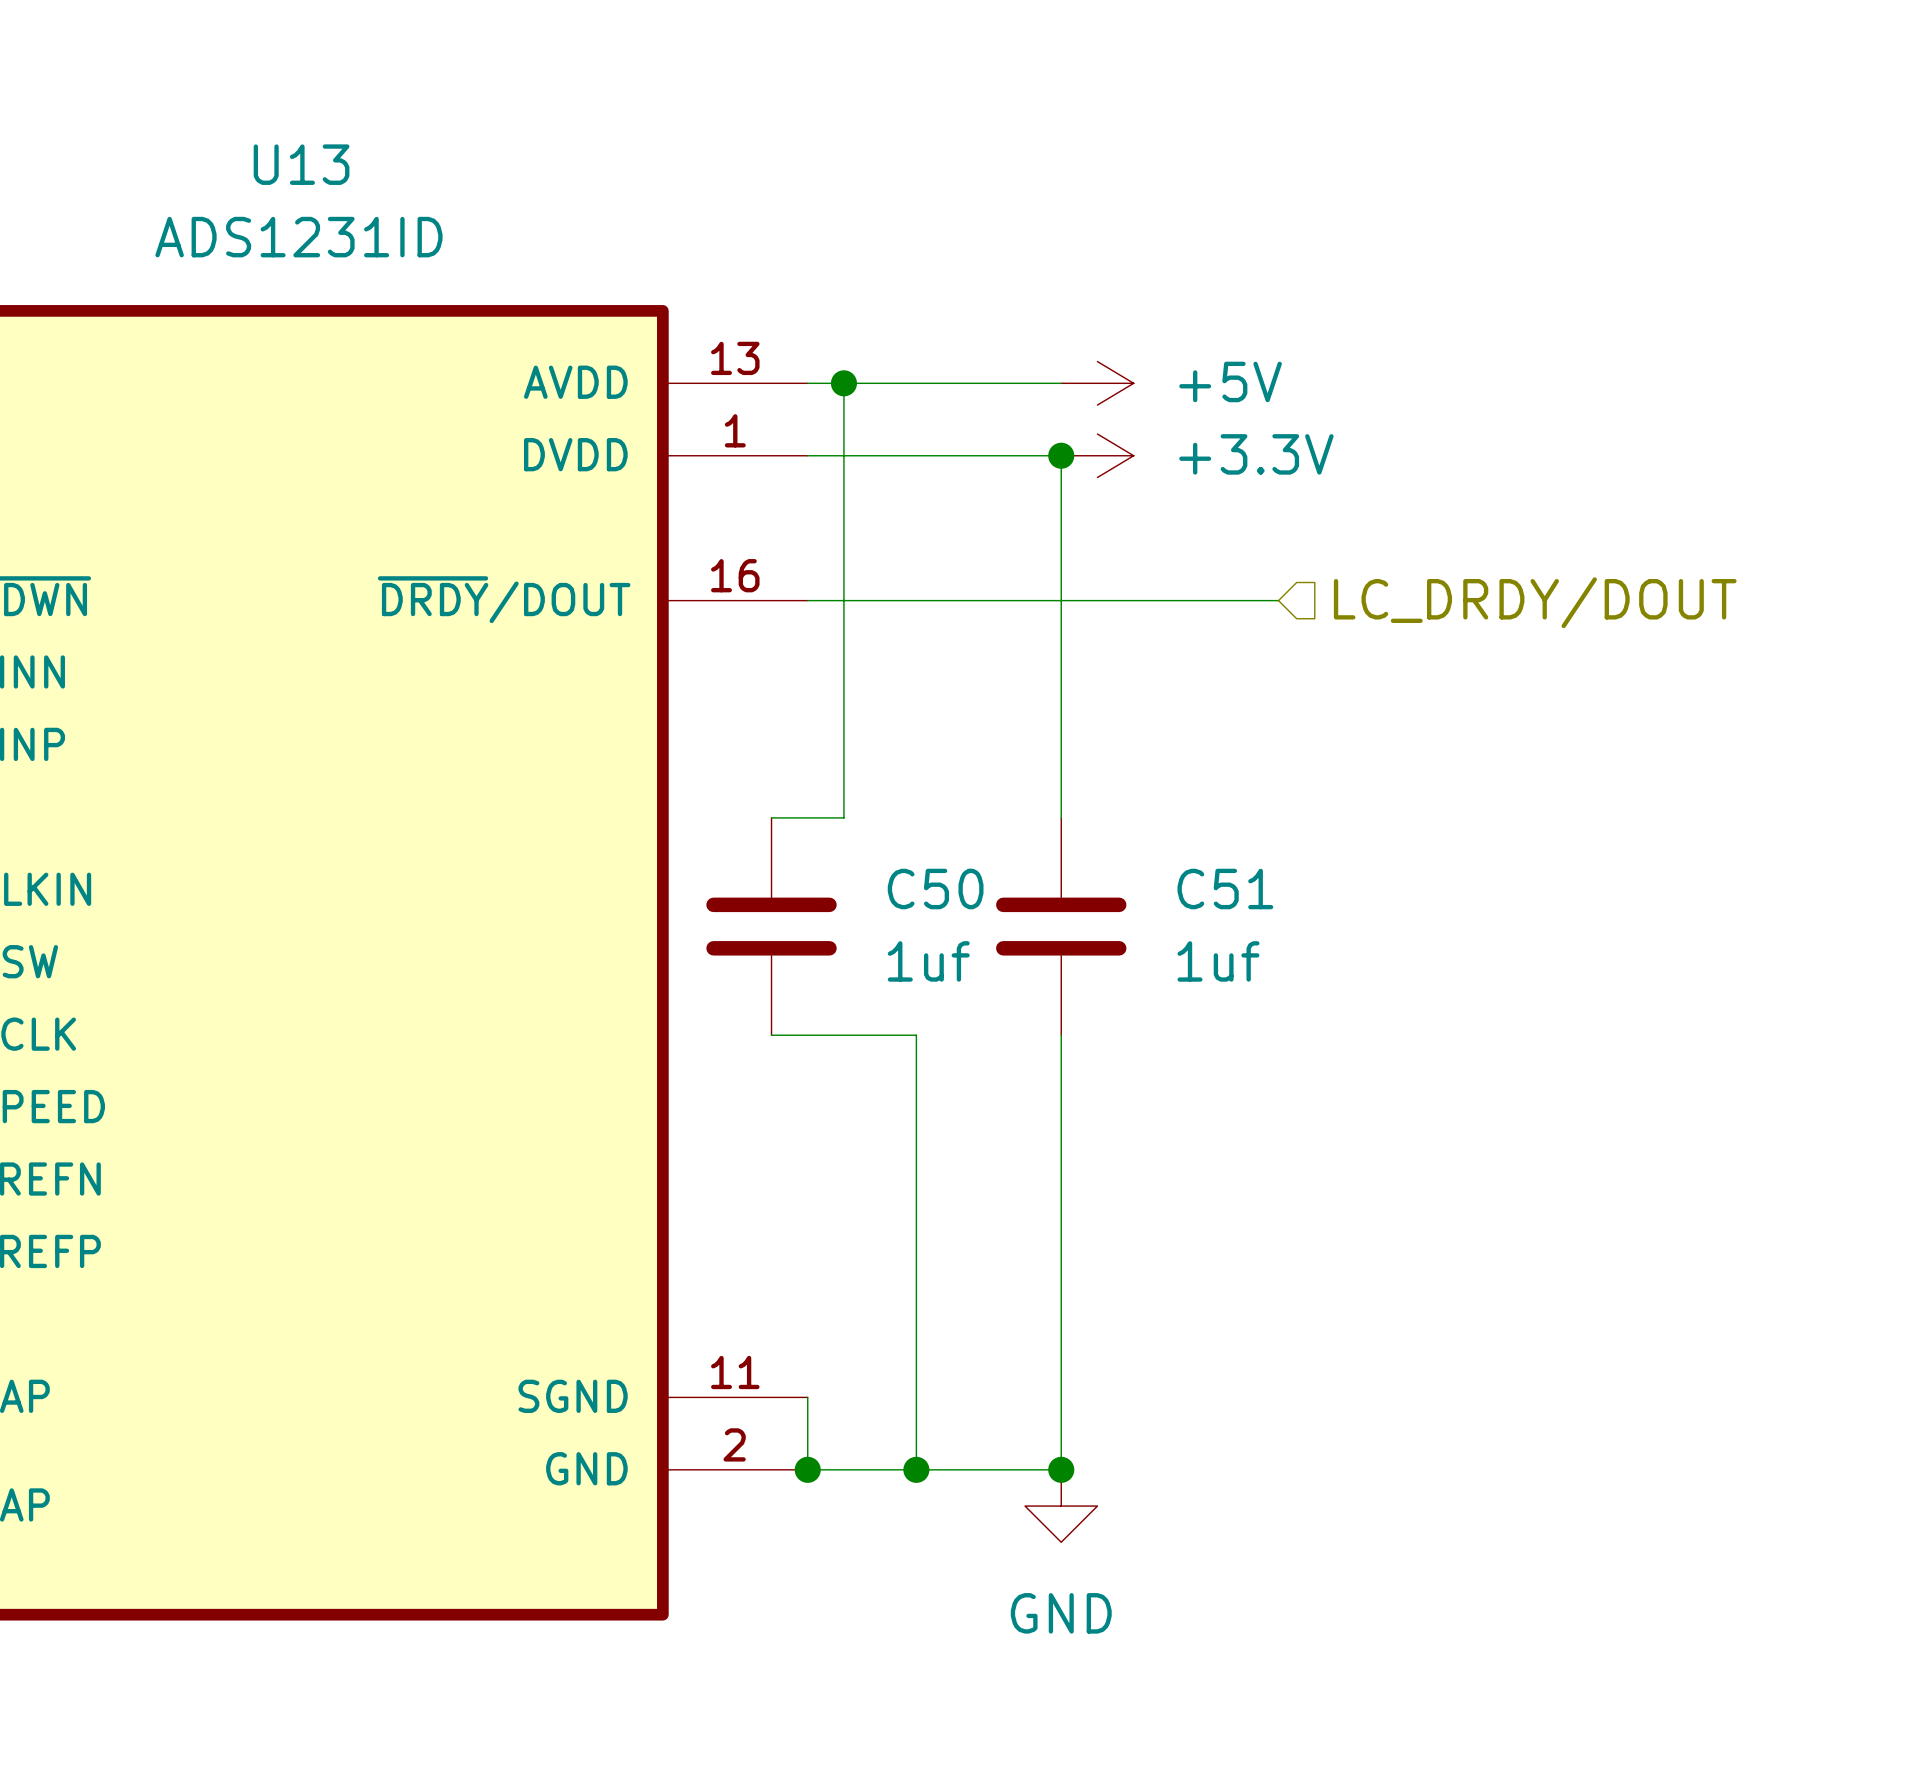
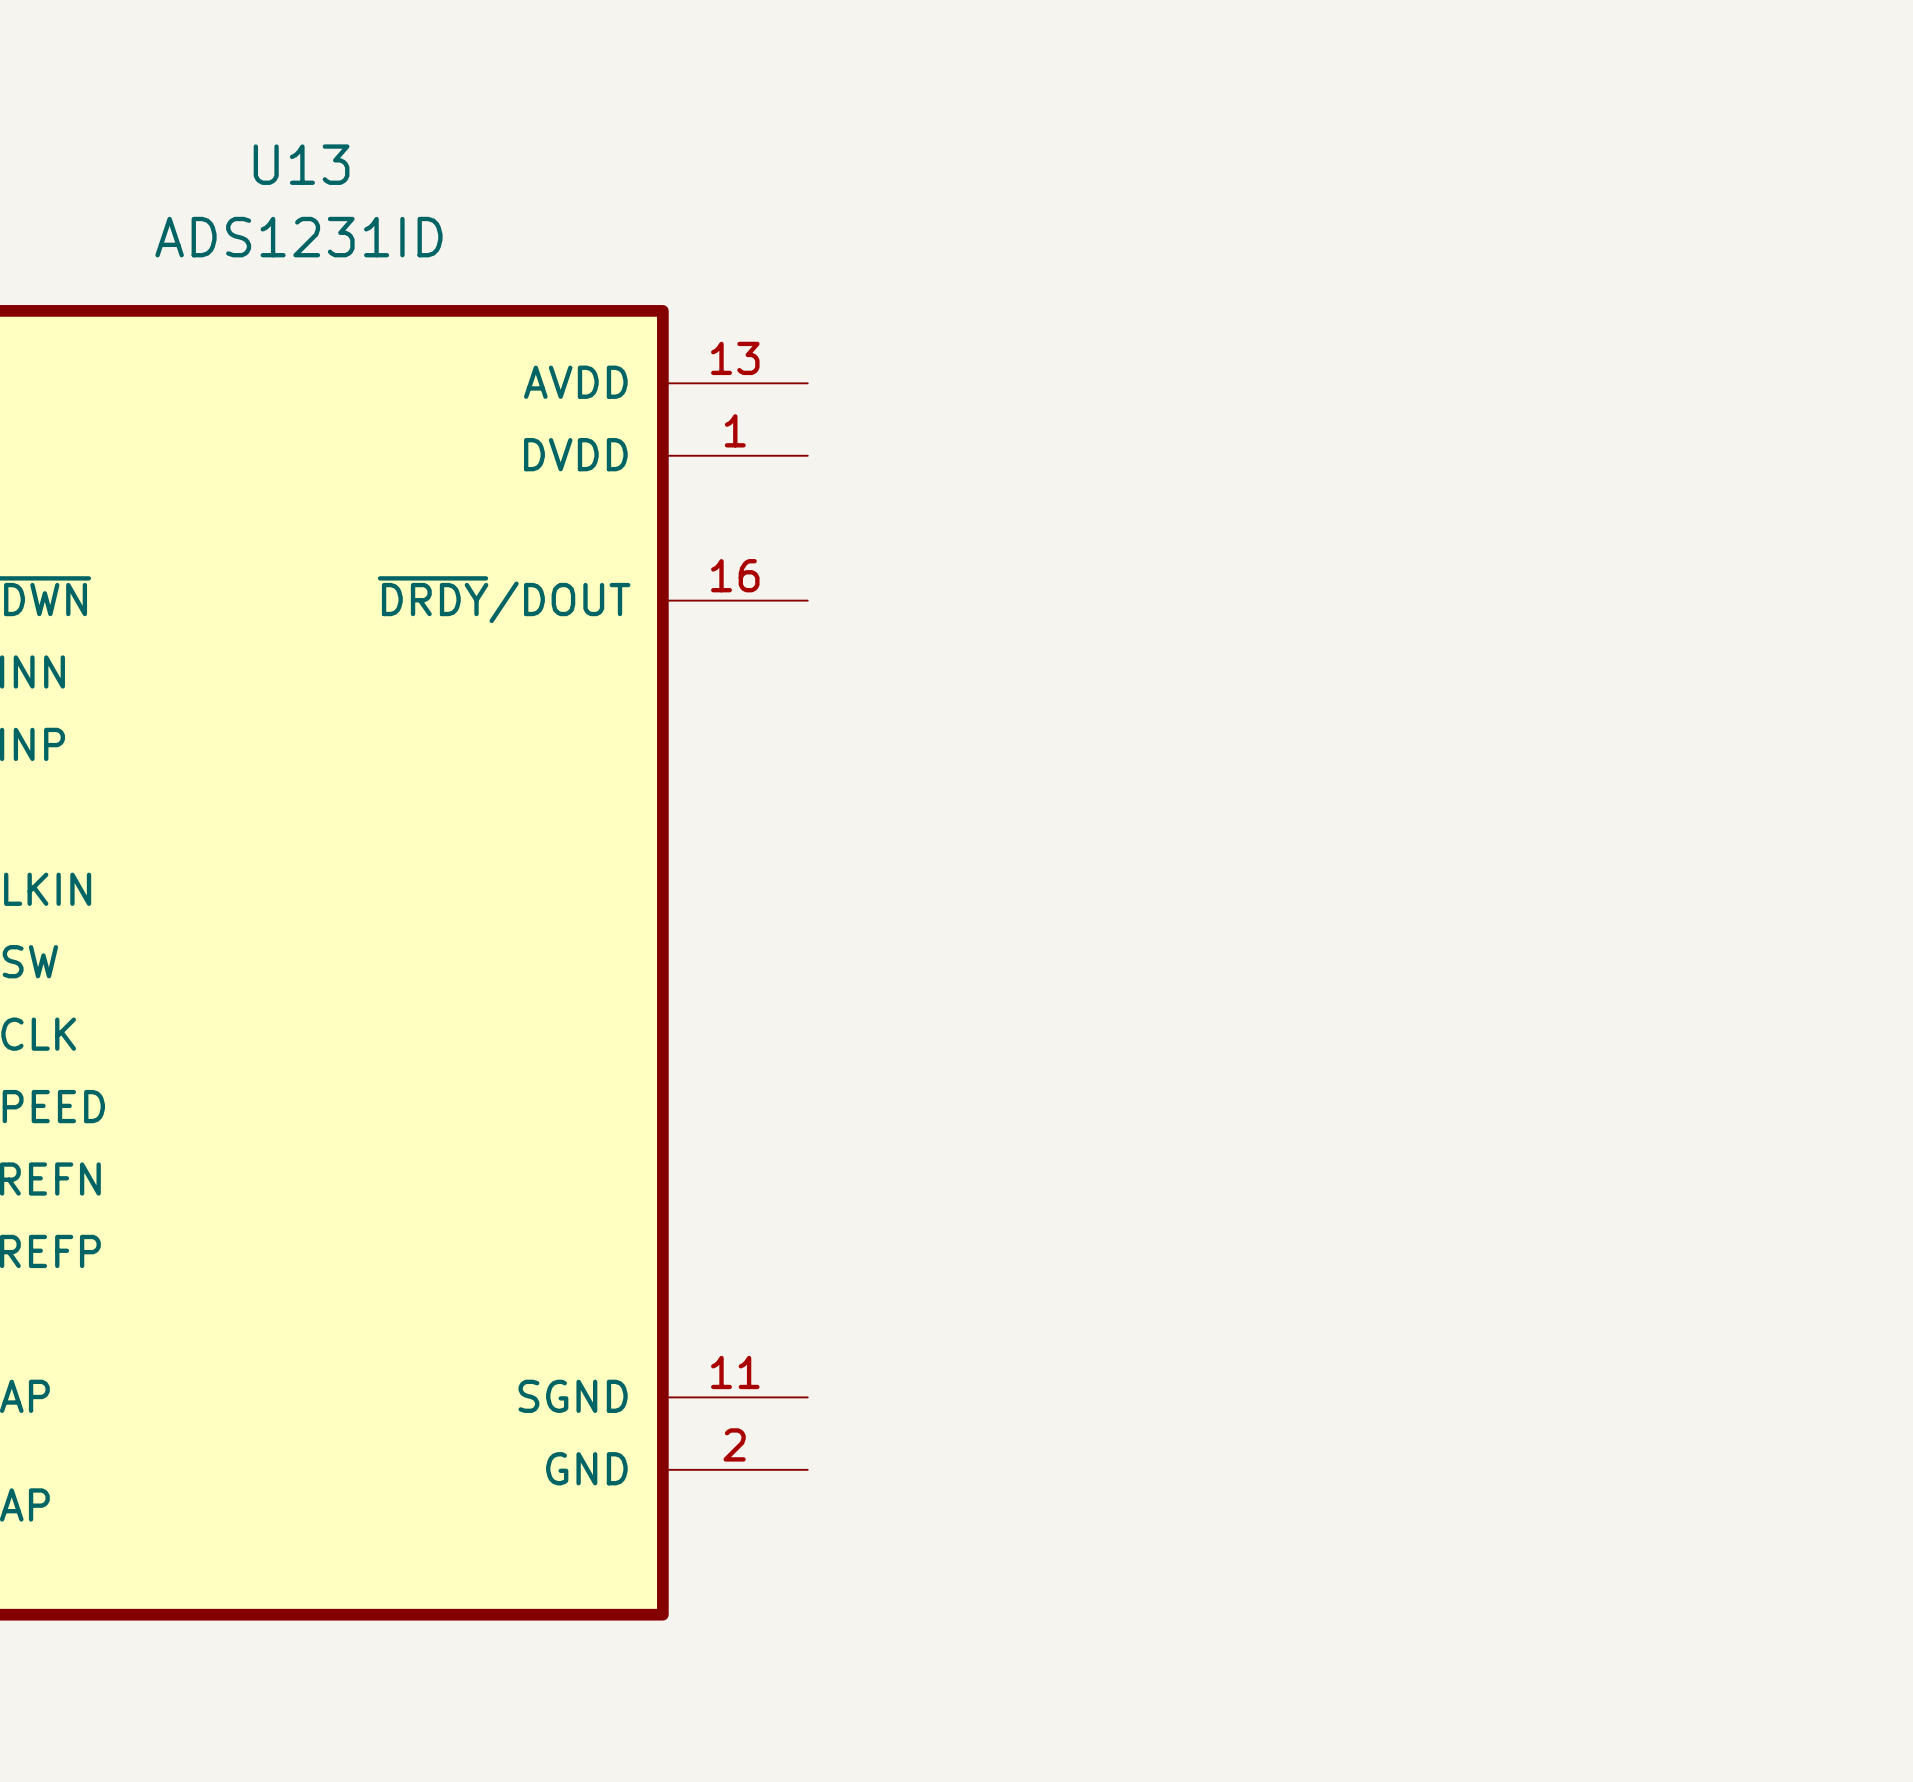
wire: (807, 383) (1061, 383) -> none
wire: (843, 383) (843, 817) (771, 817) -> none
junction: (843, 383) -> none
power symbol: +5V (1097, 383) -> none
wire: (807, 455) (1061, 455) (1061, 817) -> none
junction: (1061, 455) -> none
power symbol: +3.3V (1097, 455) -> none
wire: (807, 600) (1278, 600) -> none
hierarchical label: LC_DRDY/DOUT (1535, 602) -> none
C50: 1uf (771, 926) -> none
C51: 1uf (1061, 926) -> none
wire: (771, 1035) (916, 1035) (916, 1469) -> none
wire: (1061, 1035) (1061, 1469) (807, 1469) (807, 1397) -> none
junction: (807, 1469) -> none
junction: (916, 1469) -> none
junction: (1061, 1469) -> none
power symbol: GND (1061, 1506) -> none

